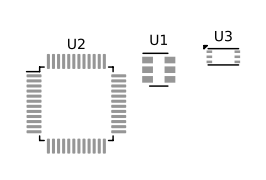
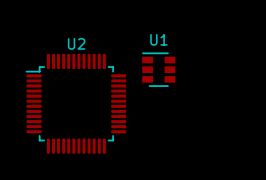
U3: (221, 55) -> none

